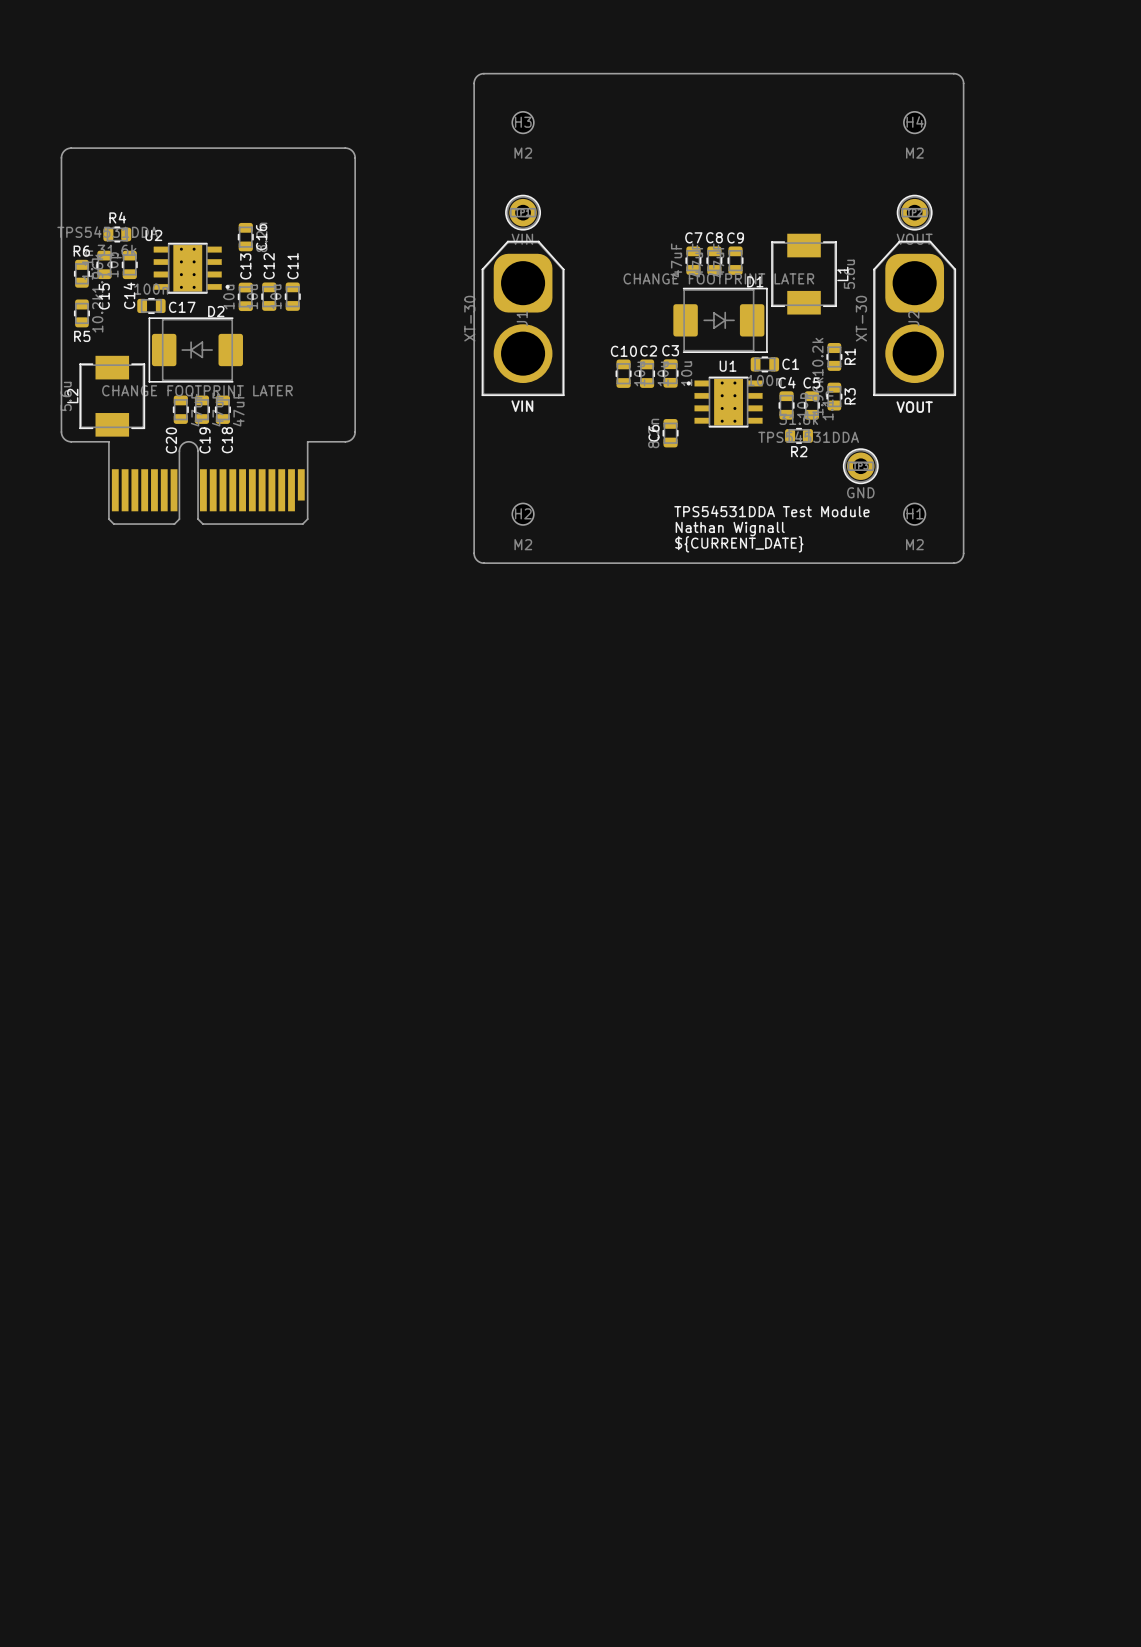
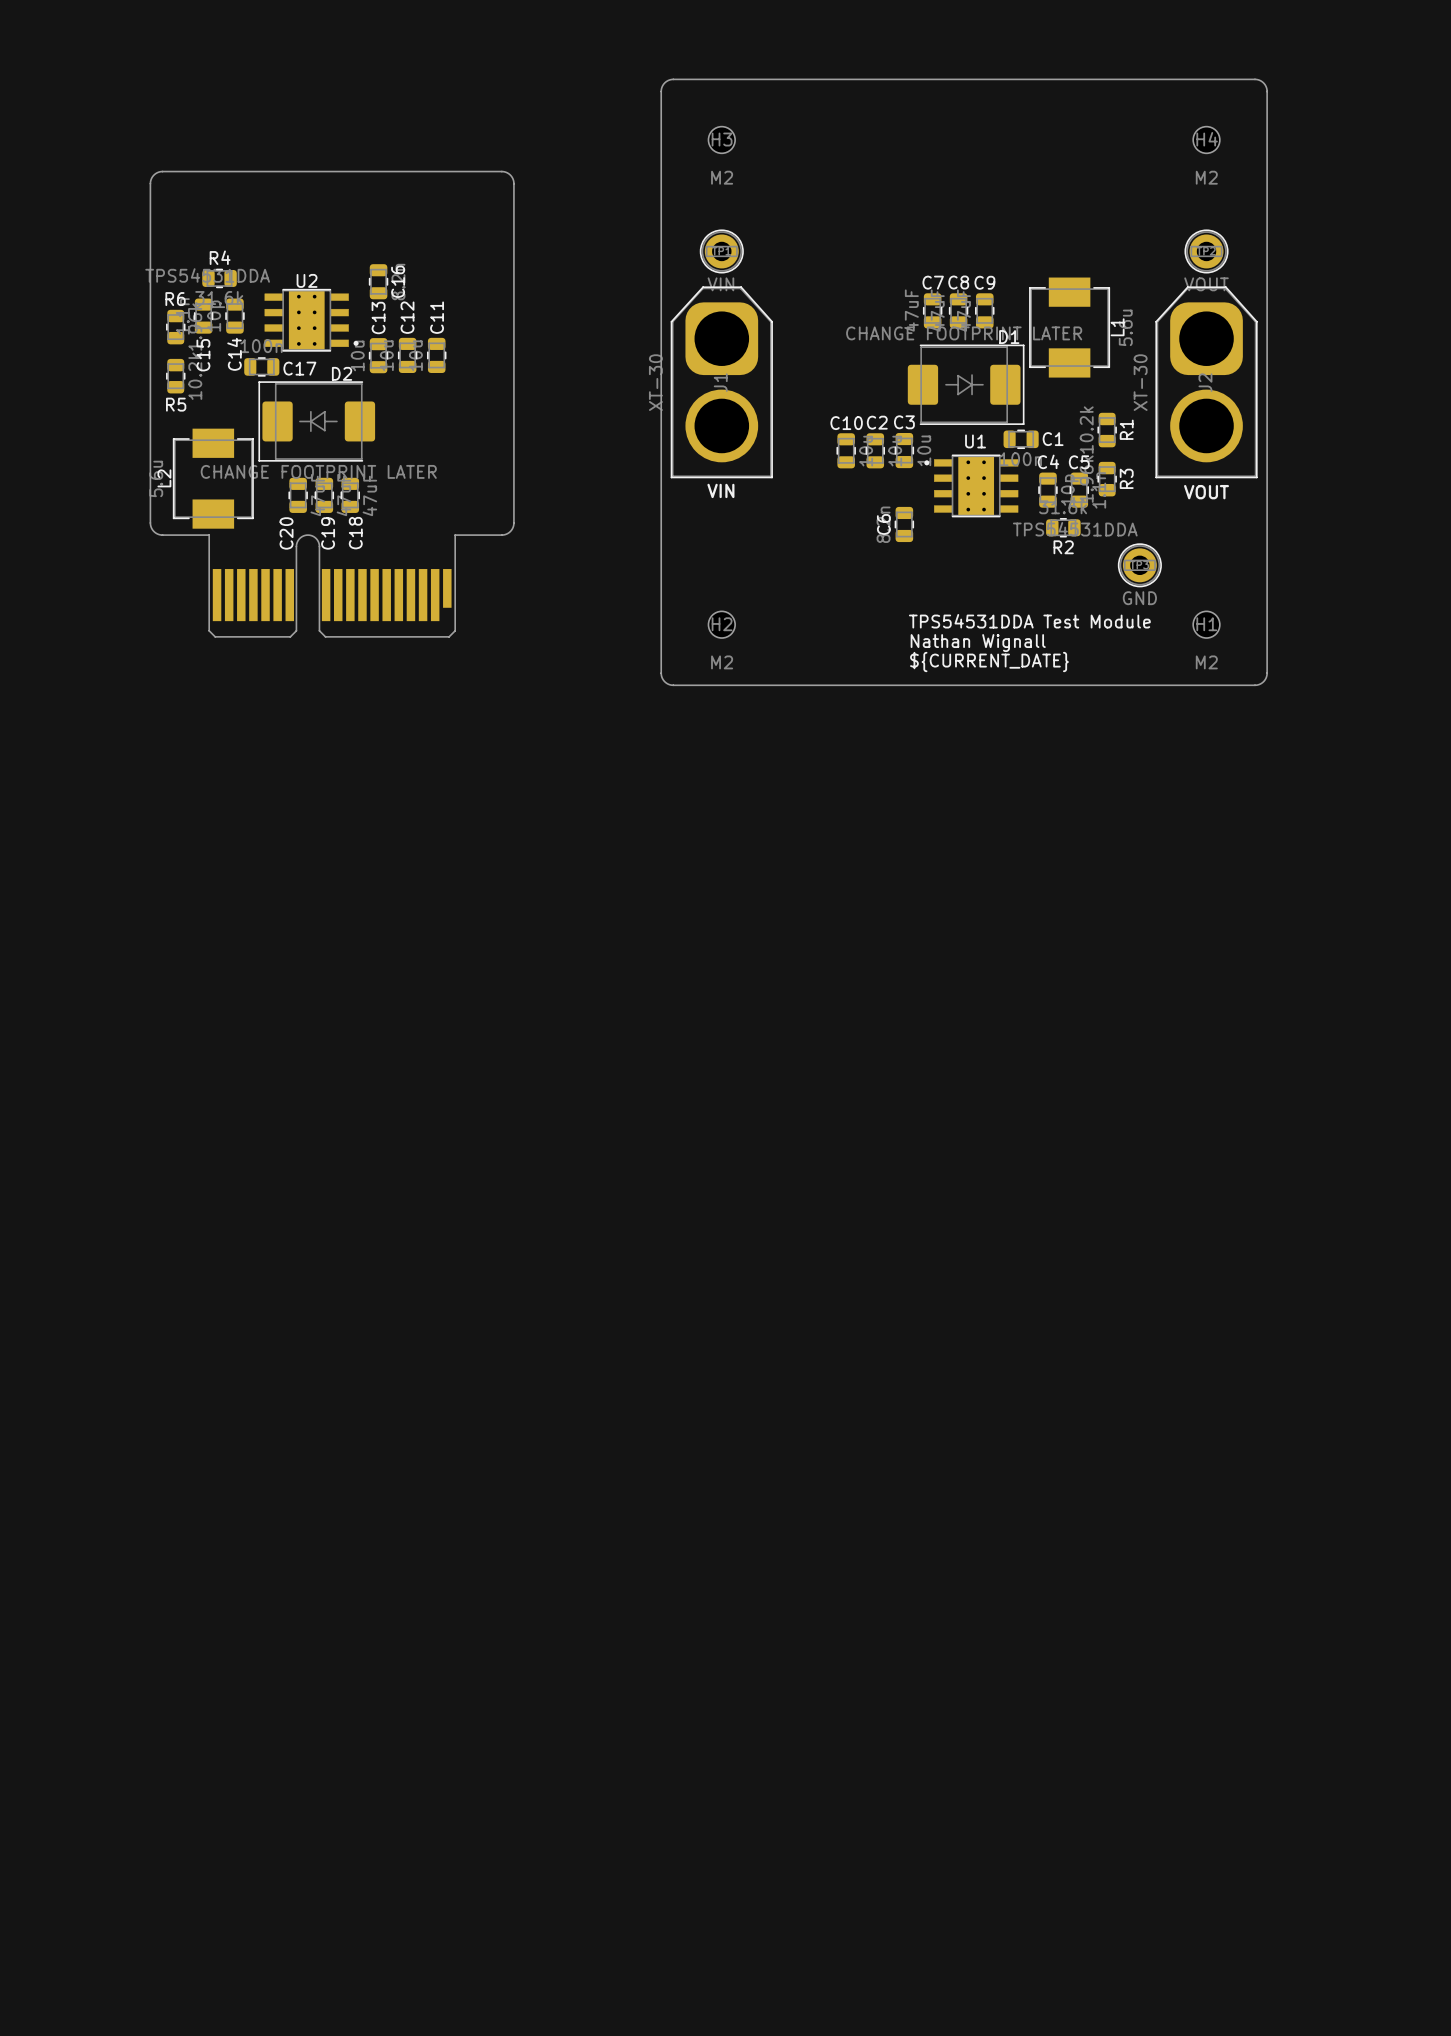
U2 name position: U2 (153, 235) -> U2 (307, 280)

